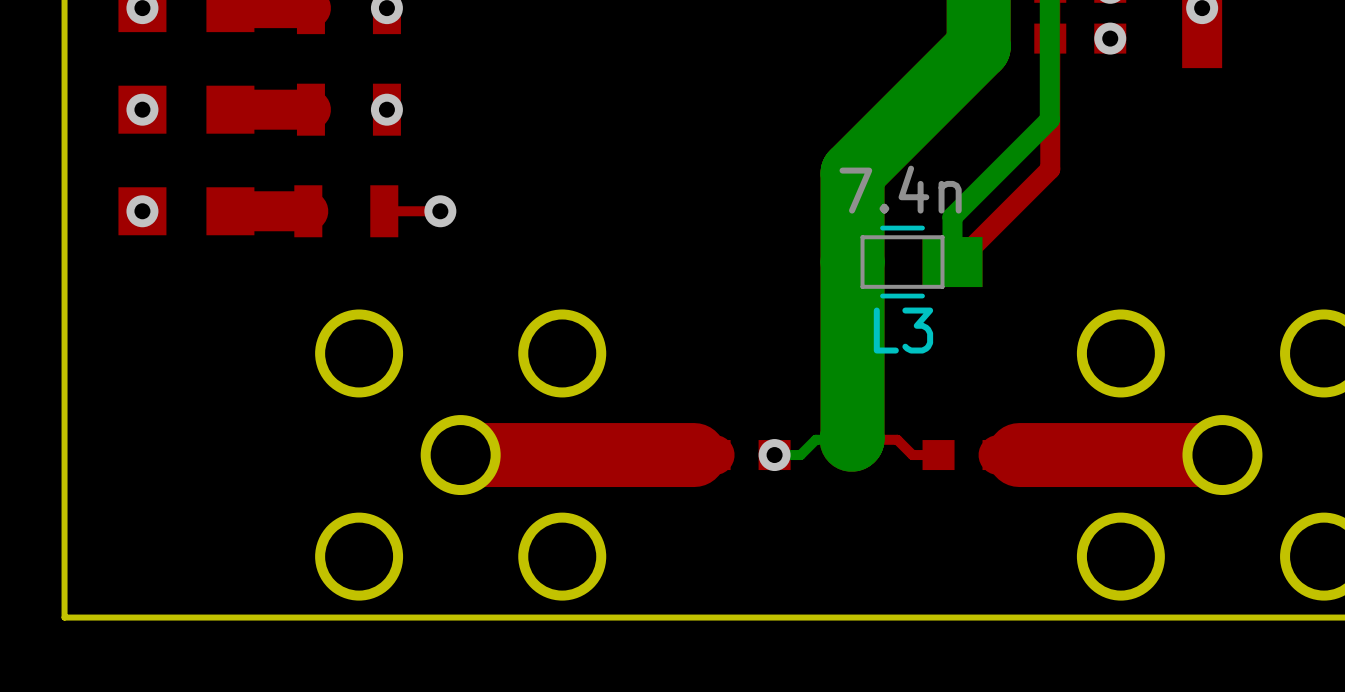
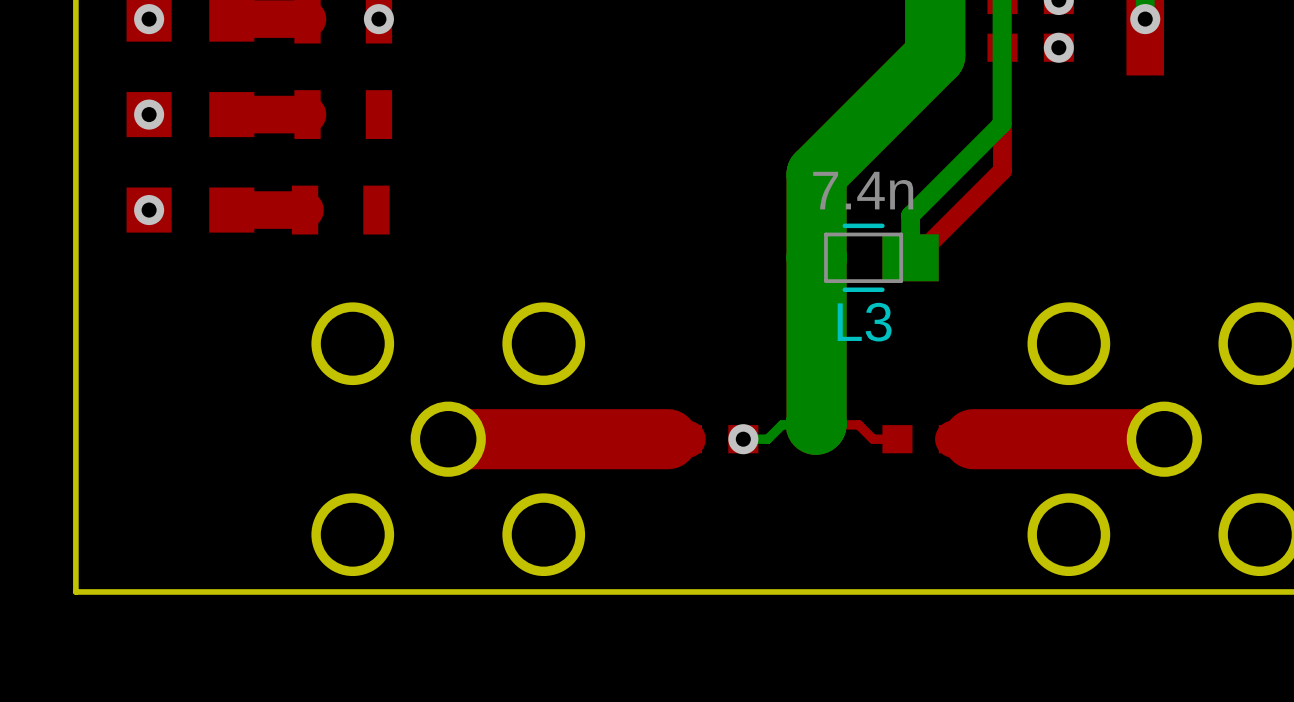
via: (386, 109) -> none
top track: (440, 211) (384, 211) -> none
via: (440, 211) -> none

